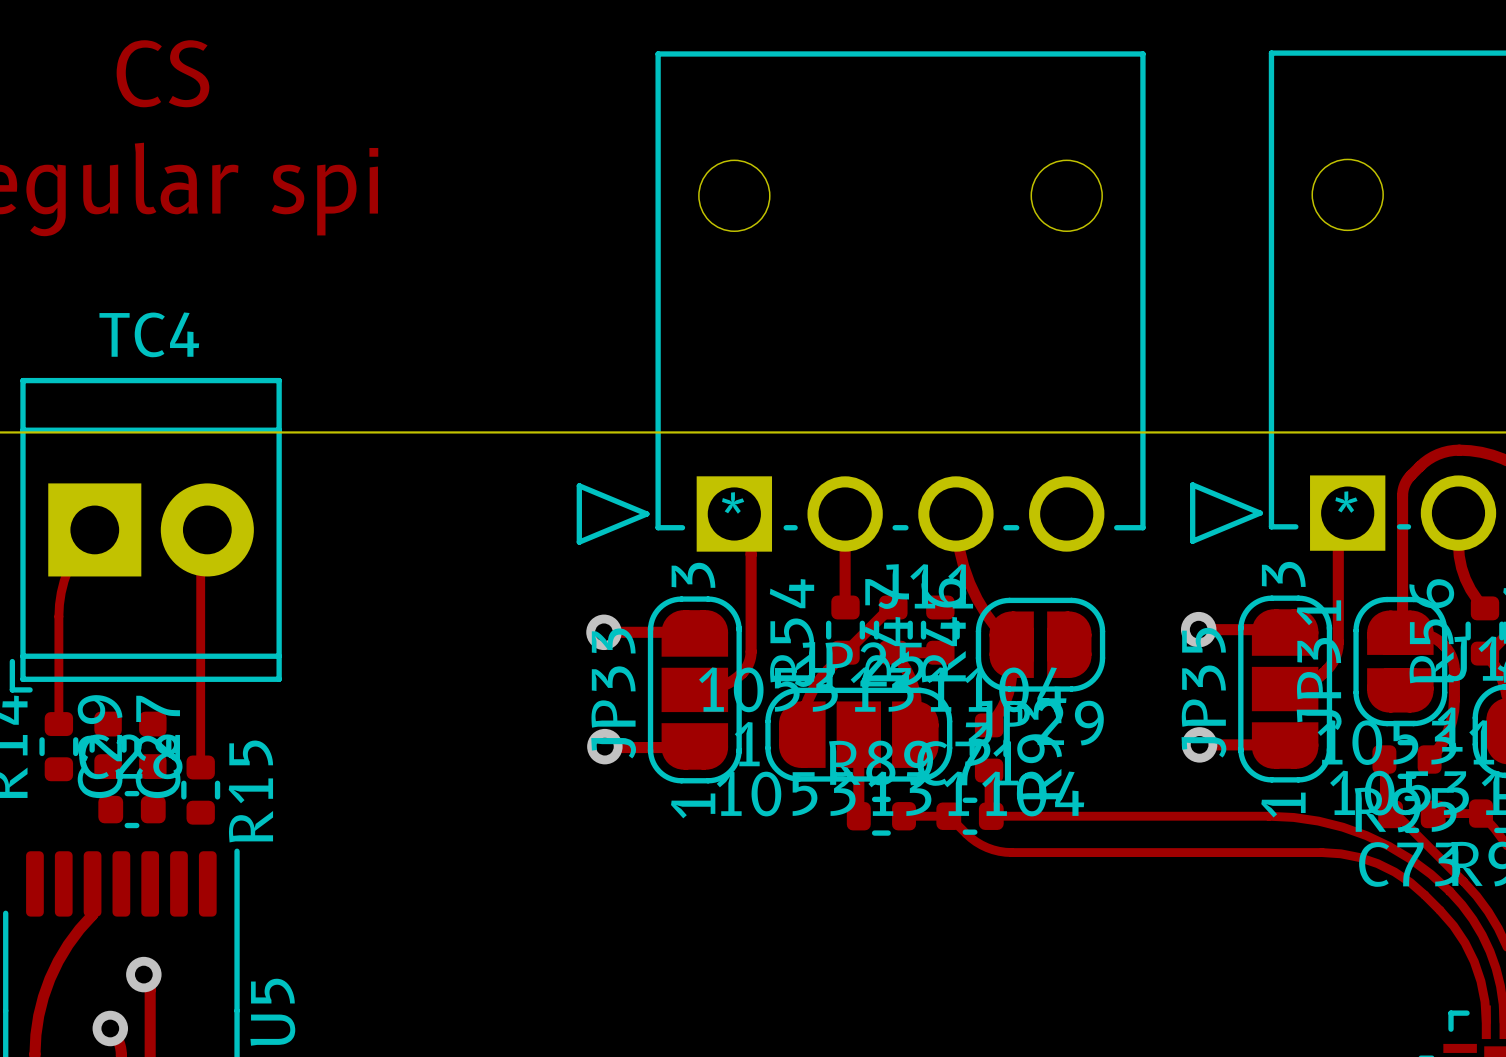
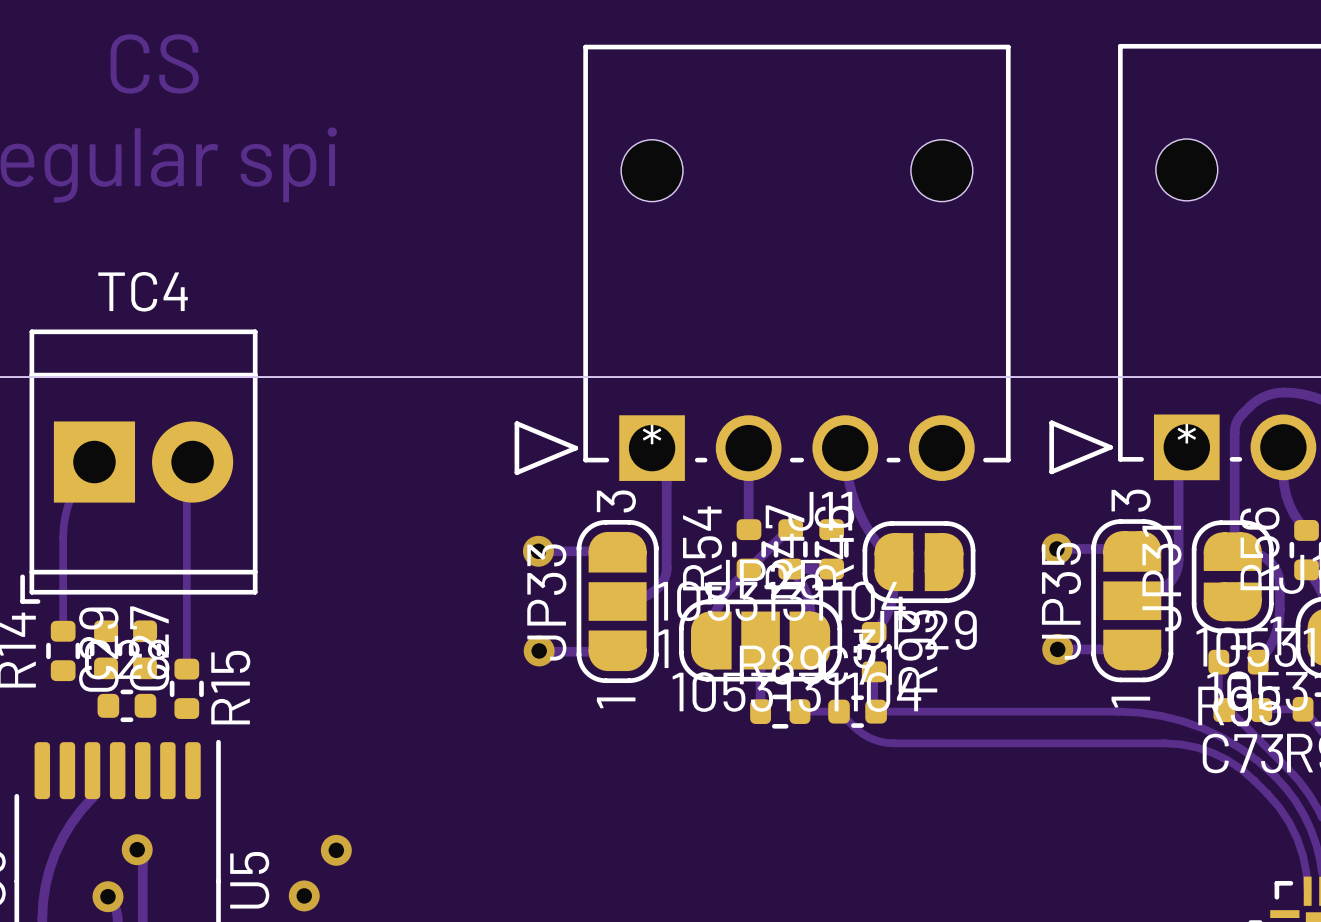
via: none -> (336, 850)
via: none -> (304, 895)

